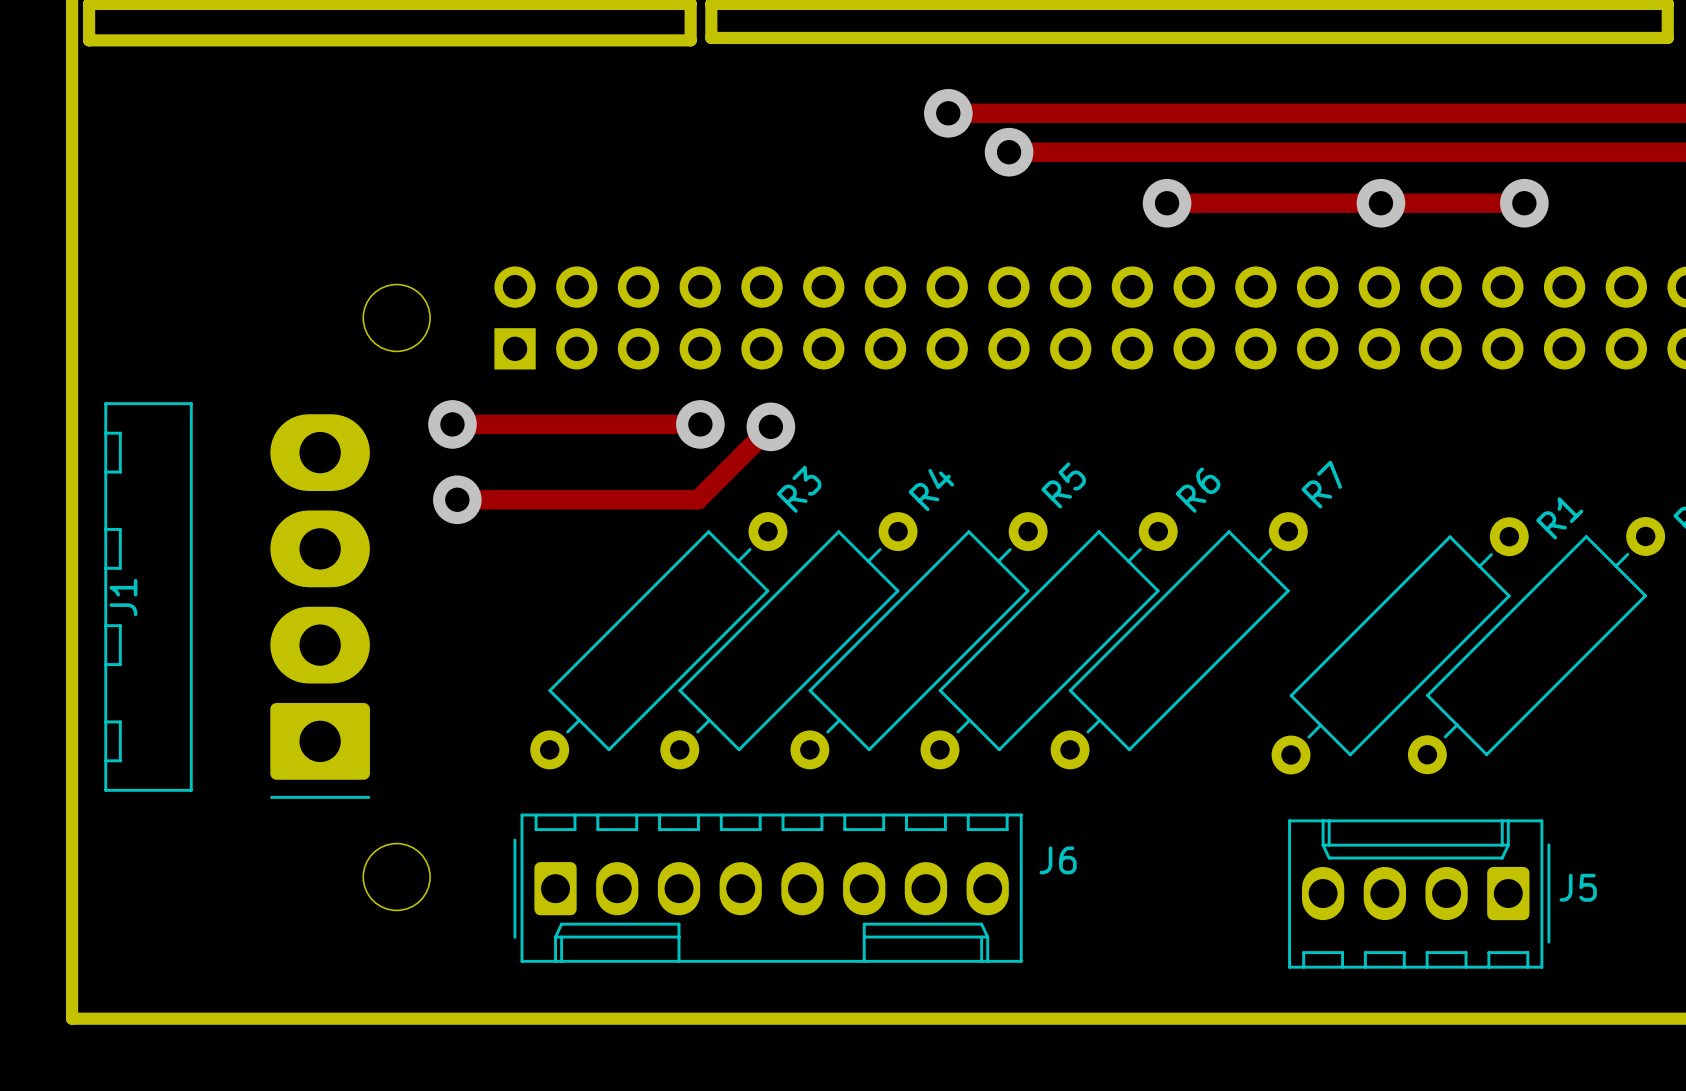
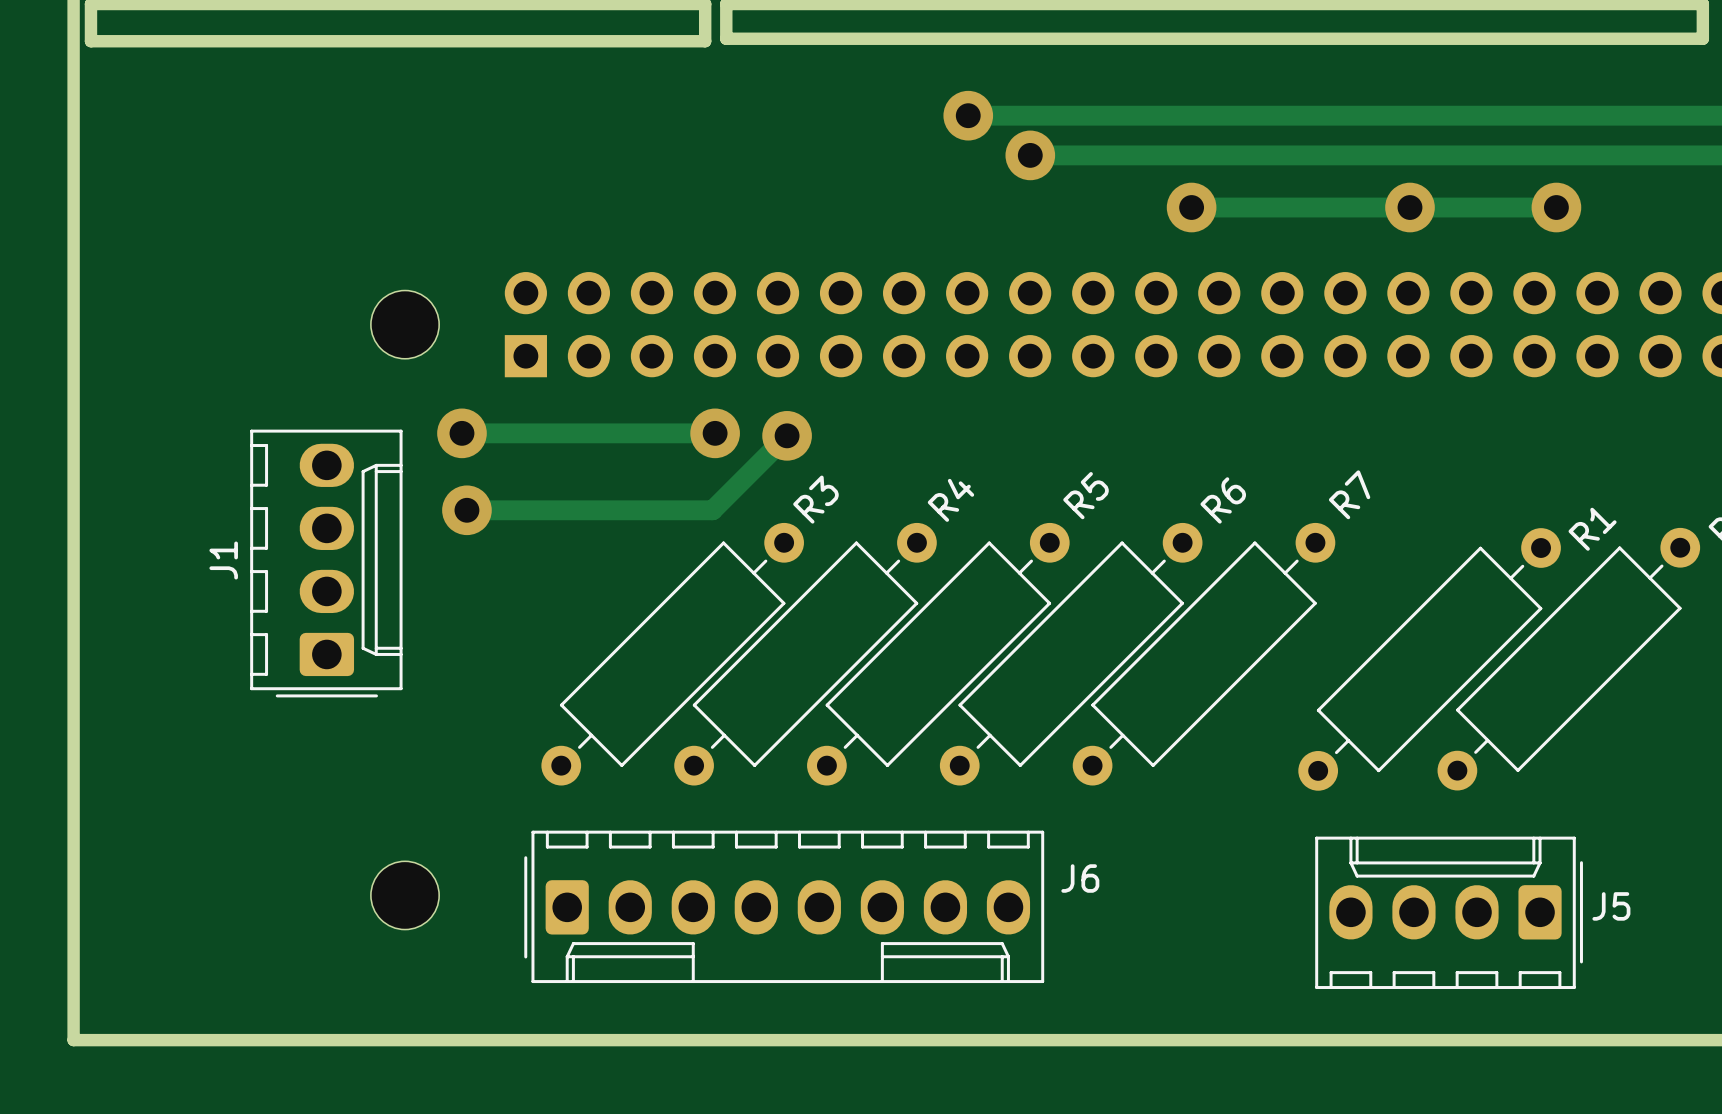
J1 footprint: [104, 402, 371, 799] -> [250, 429, 403, 698]

